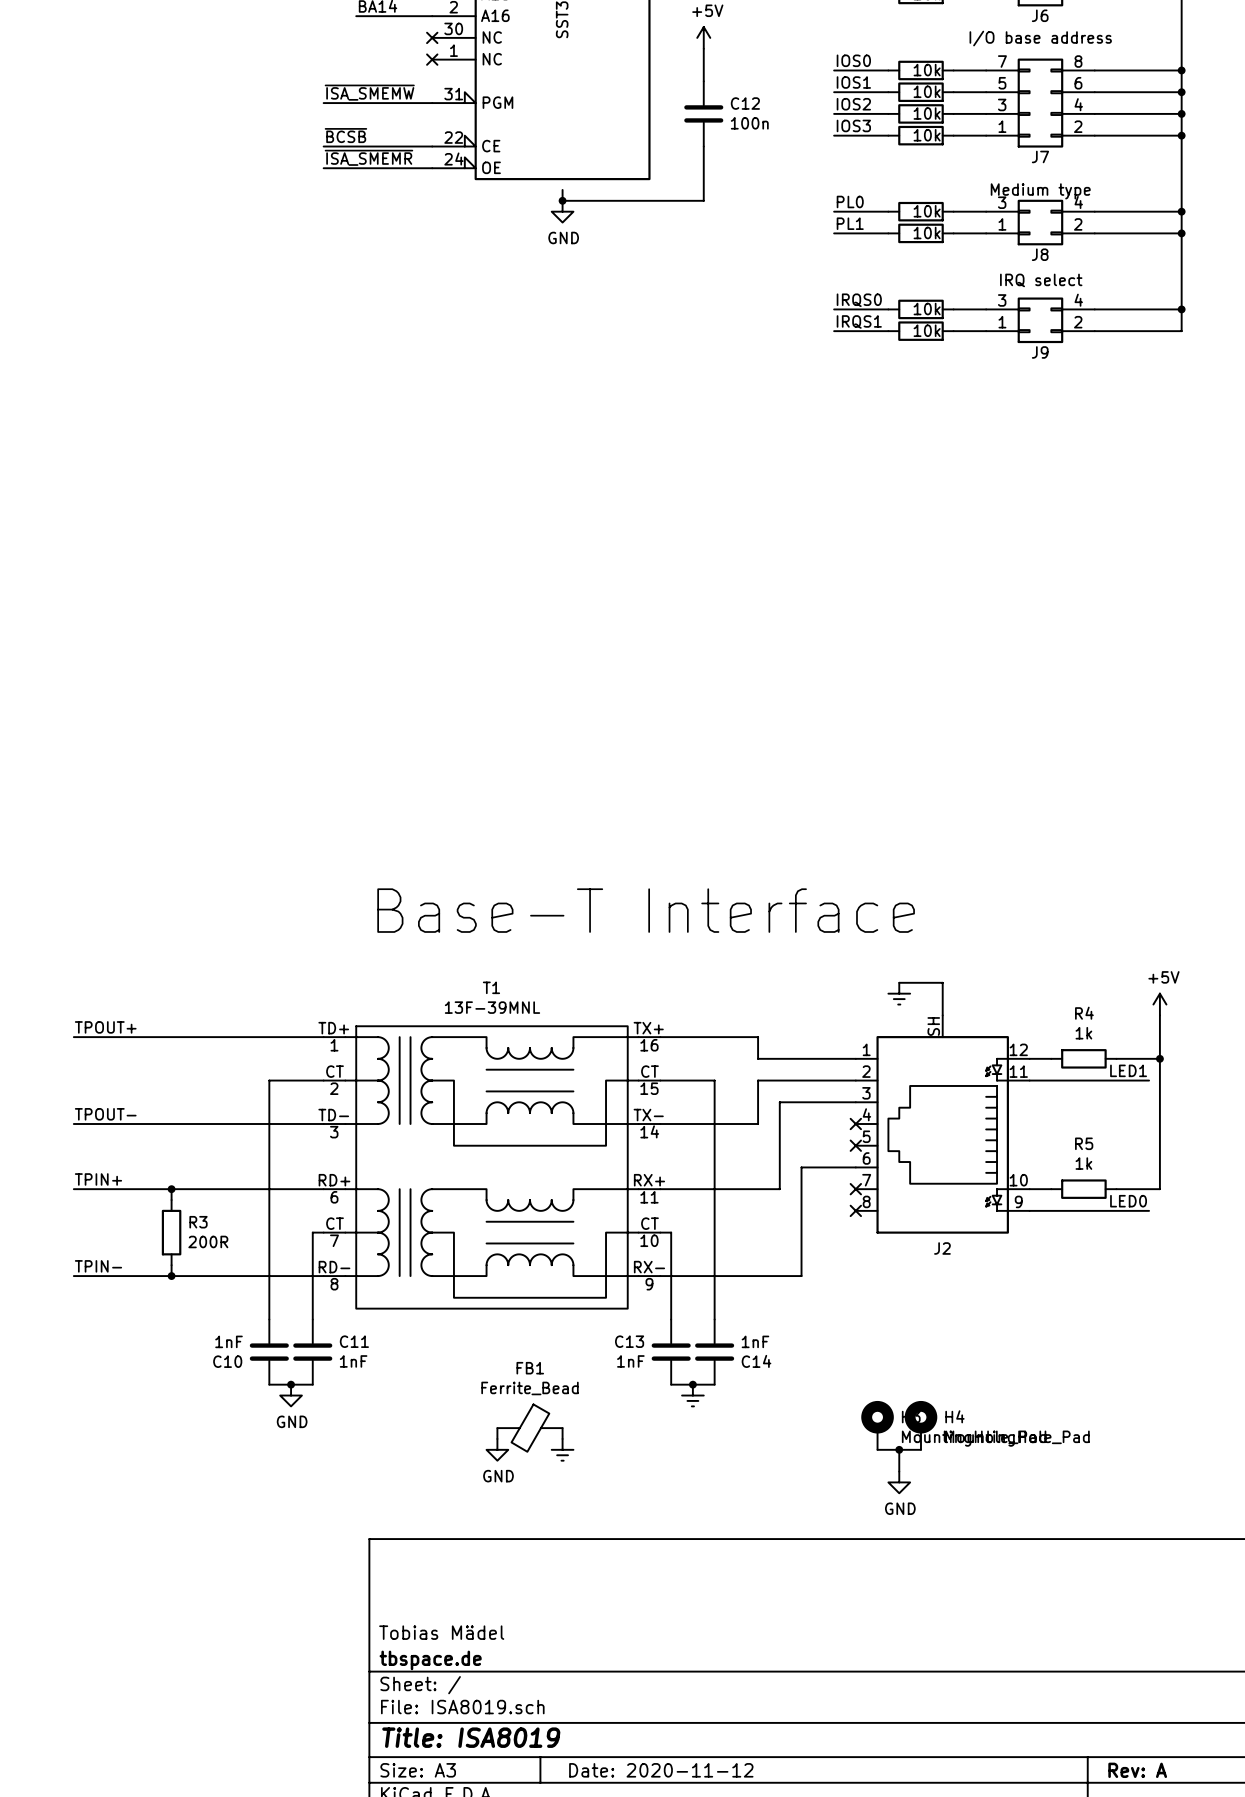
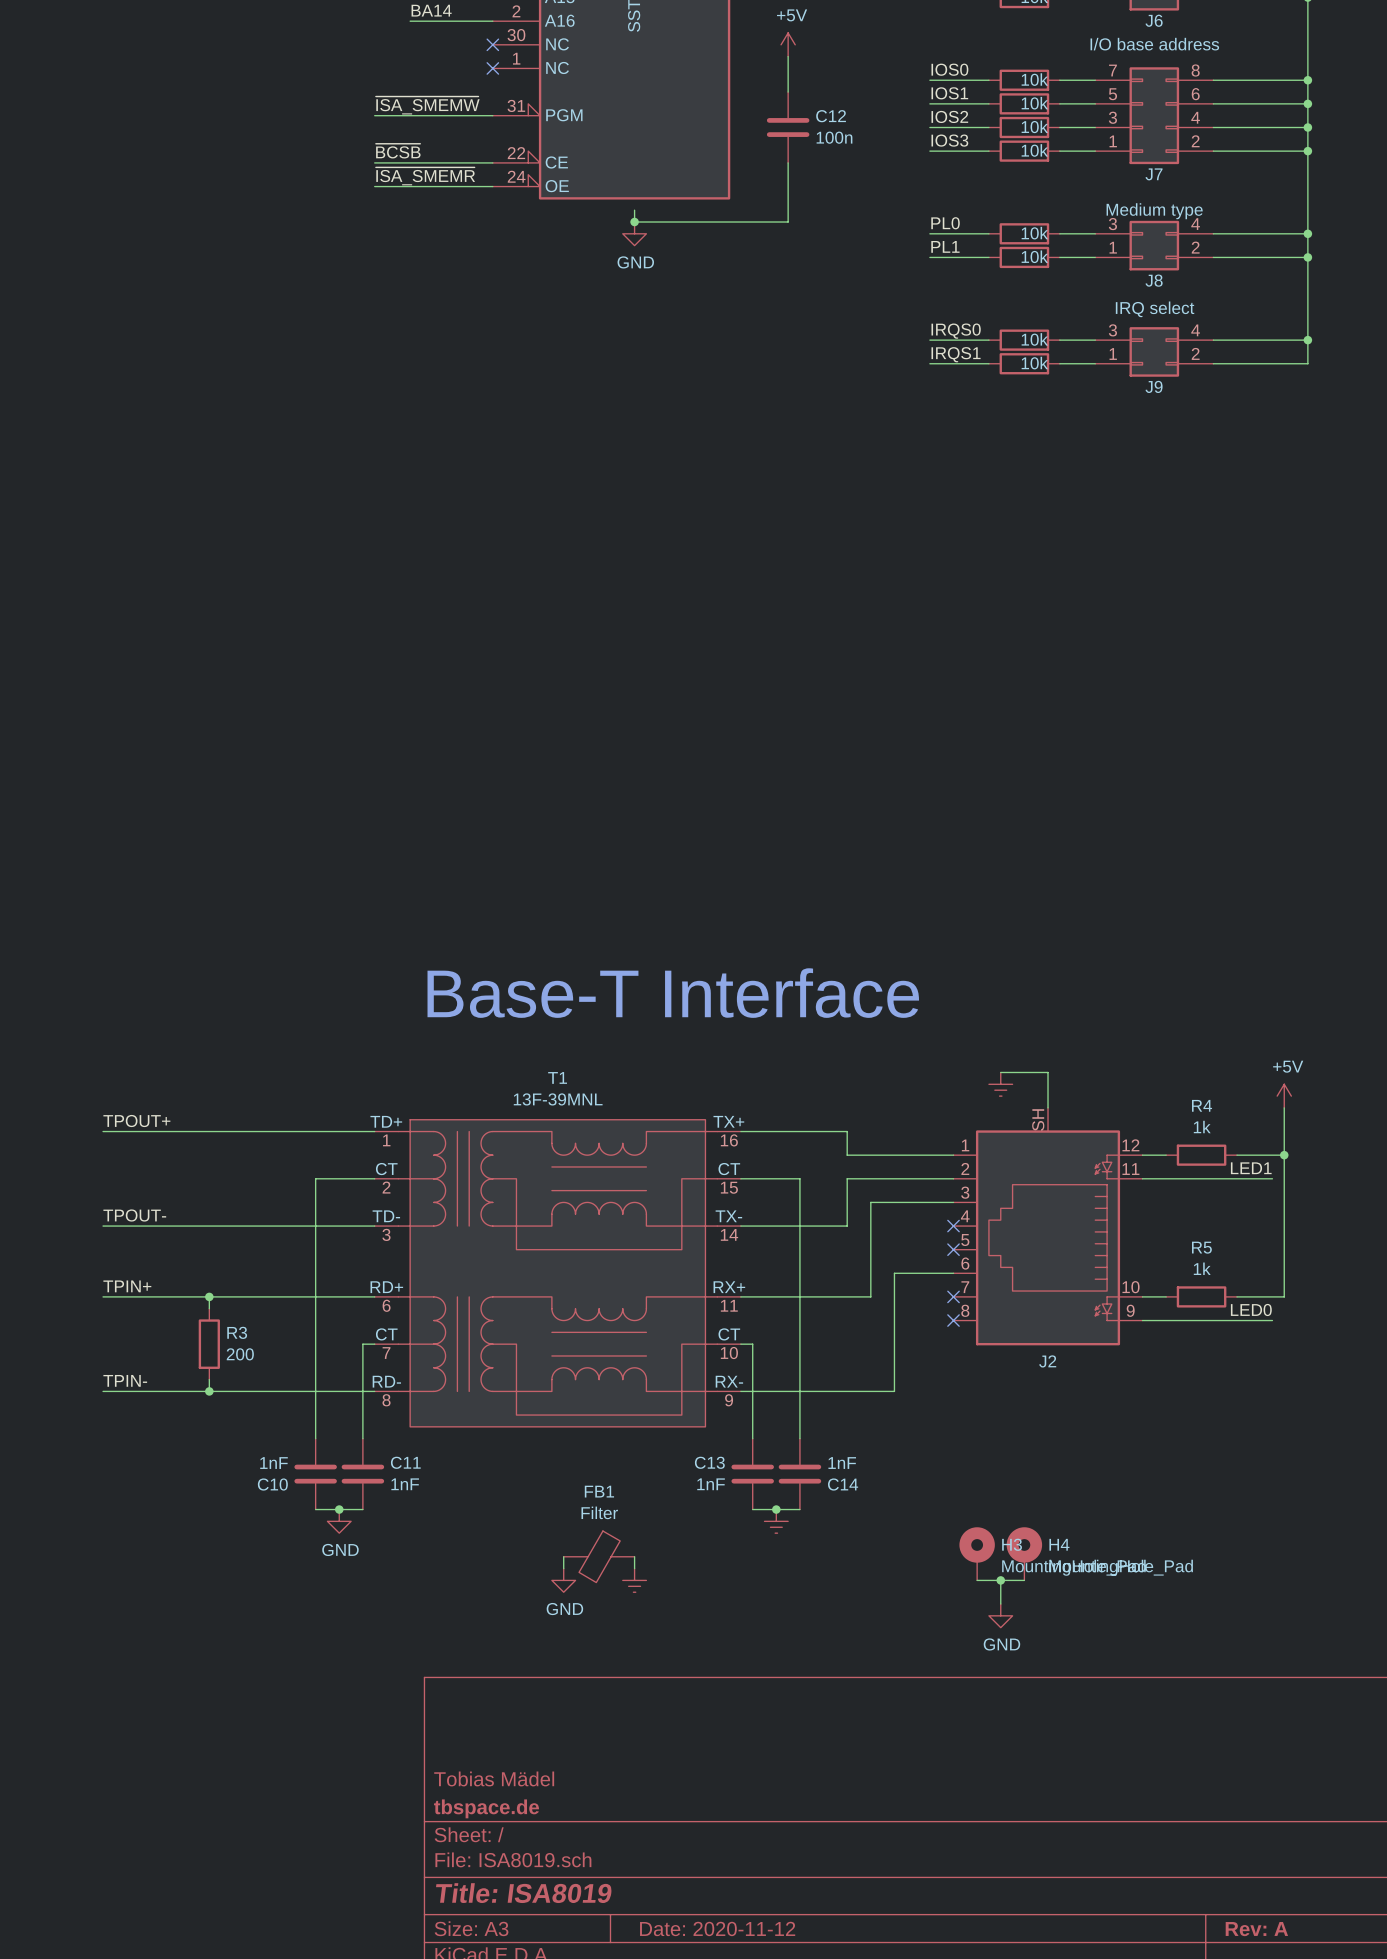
R3 value: 200R (208, 1241) -> 200 (240, 1354)
FB1 value: Ferrite_Bead (529, 1388) -> Filter (599, 1512)

